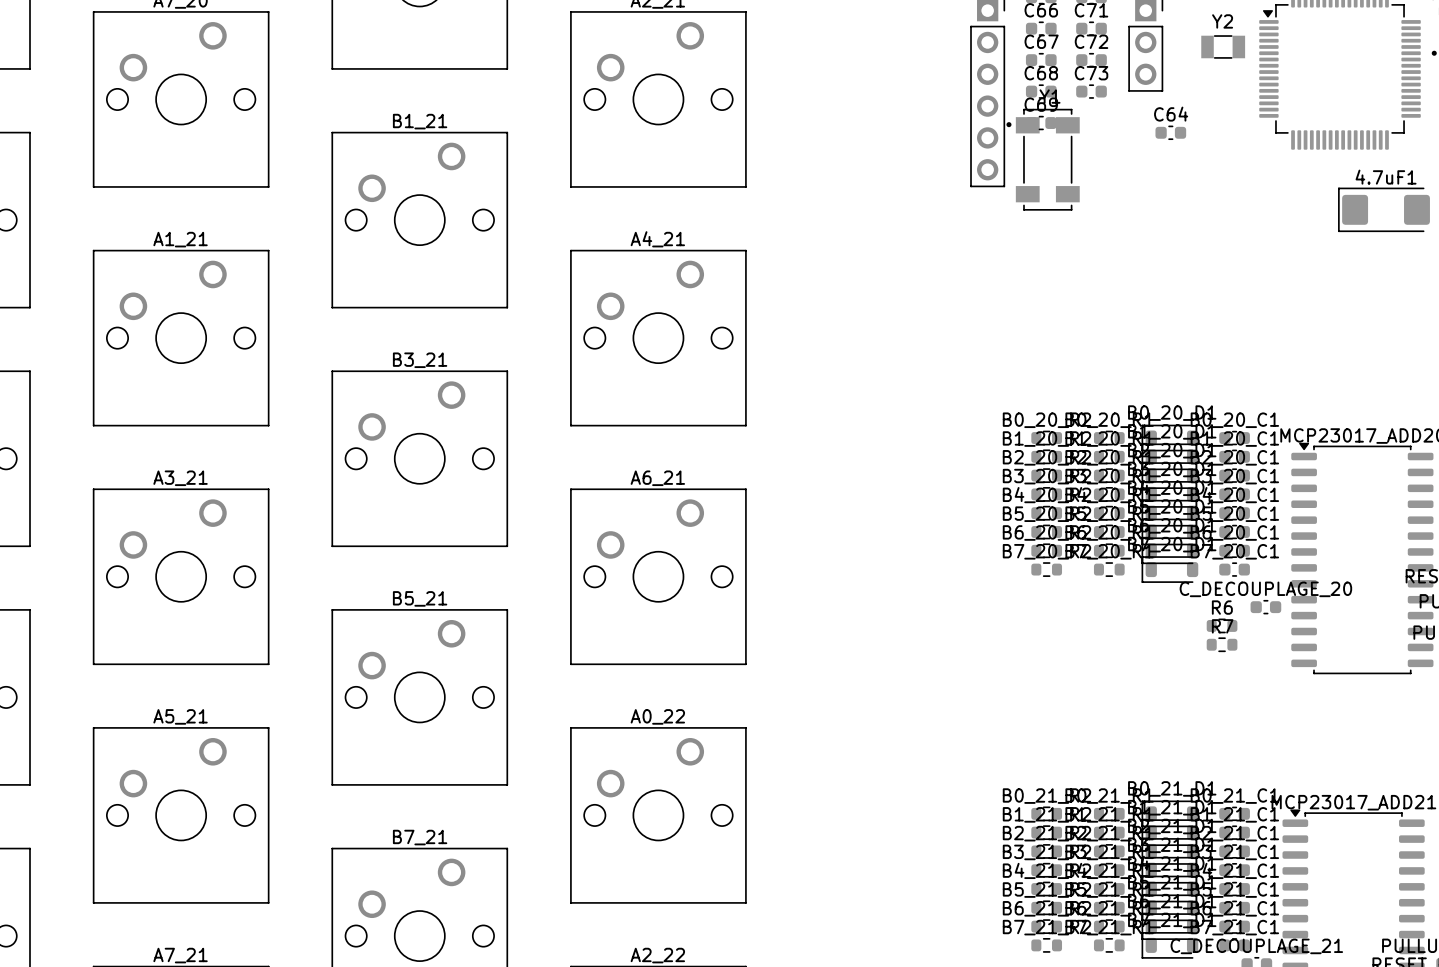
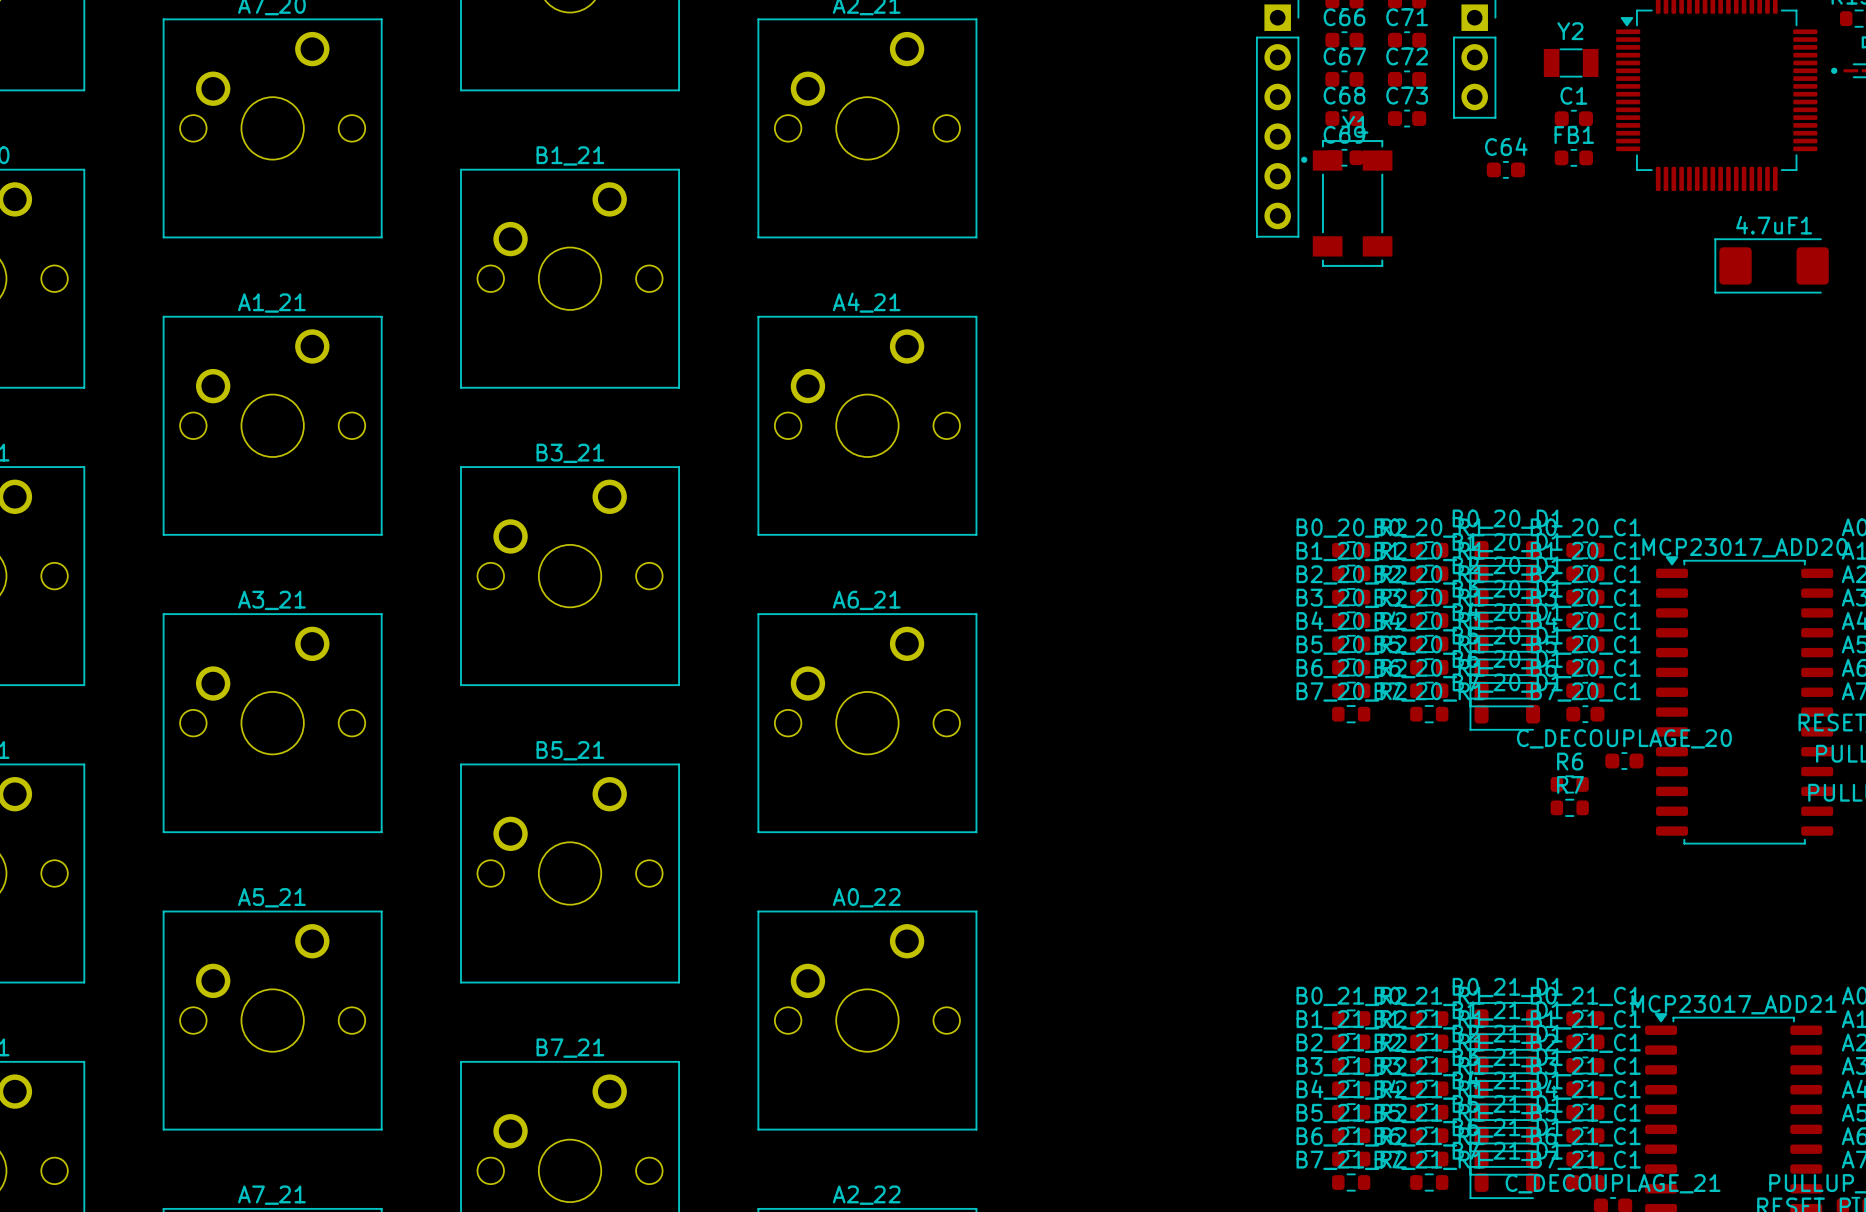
C1: none -> (1573, 118)
FB1: none -> (1573, 157)

